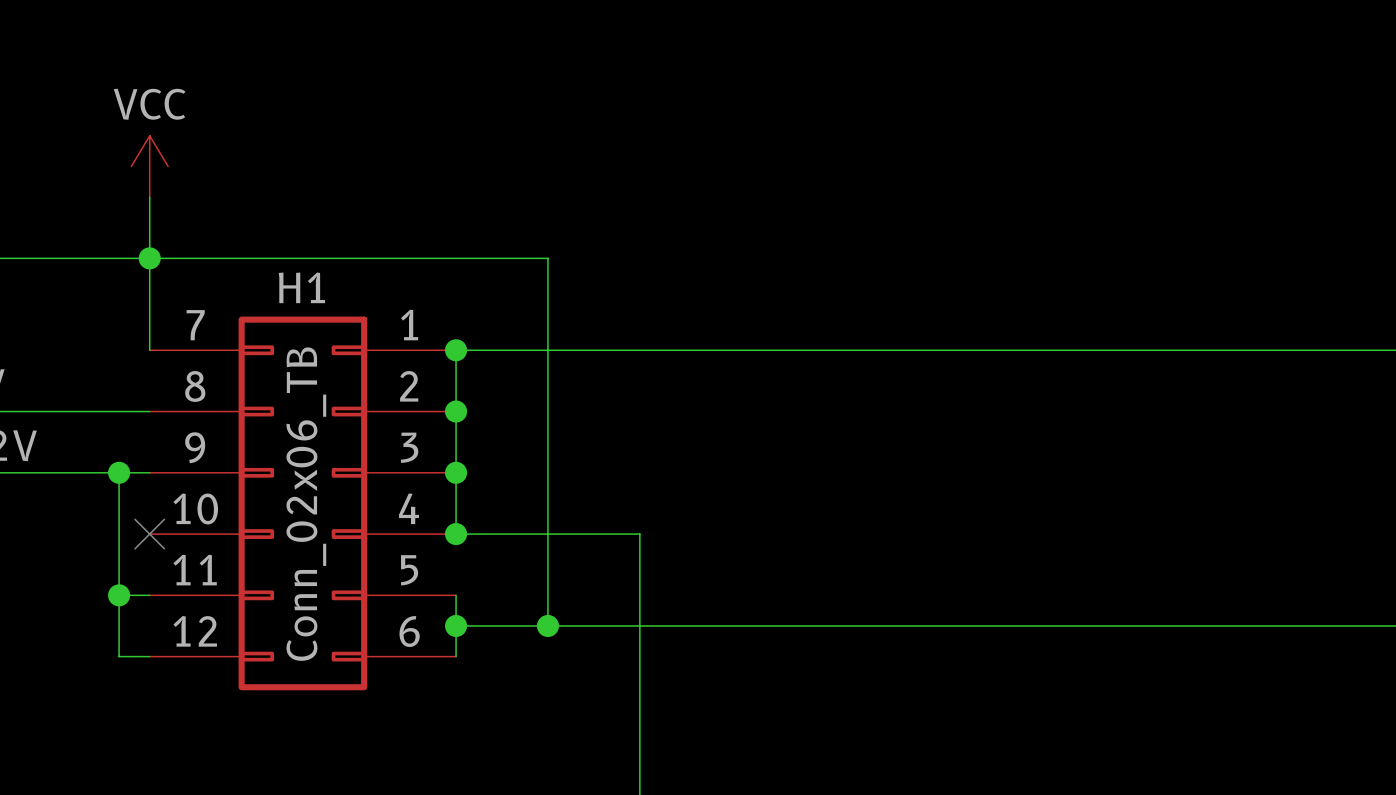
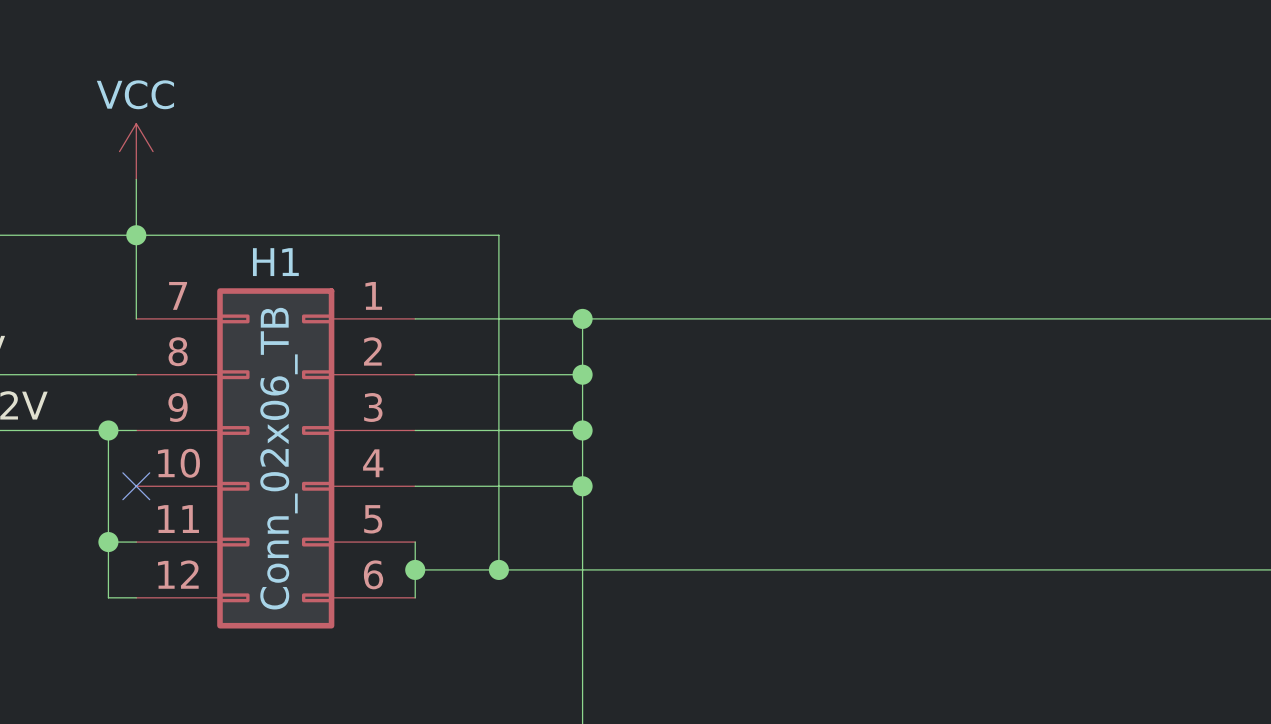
wire: (456, 350) (456, 534) -> (582, 318) (582, 486)
junction: (456, 350) -> none
junction: none -> (582, 318)
wire: none -> (415, 374) (582, 374)
junction: (456, 411) -> none
junction: none -> (582, 374)
wire: none -> (415, 430) (582, 430)
junction: (456, 472) -> none
junction: none -> (582, 430)
junction: (456, 534) -> none
junction: none -> (582, 486)

